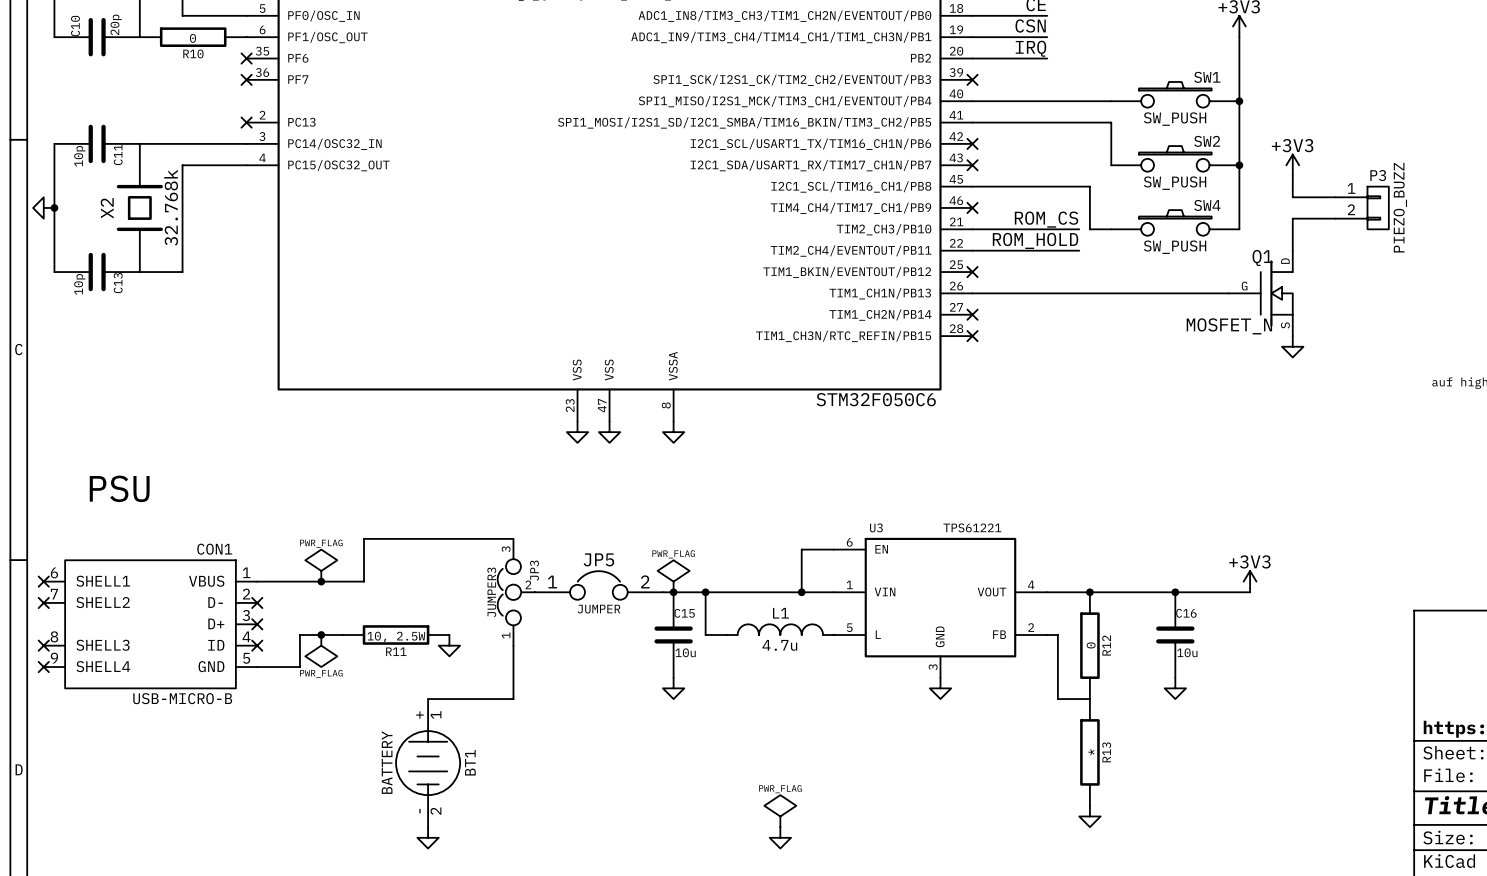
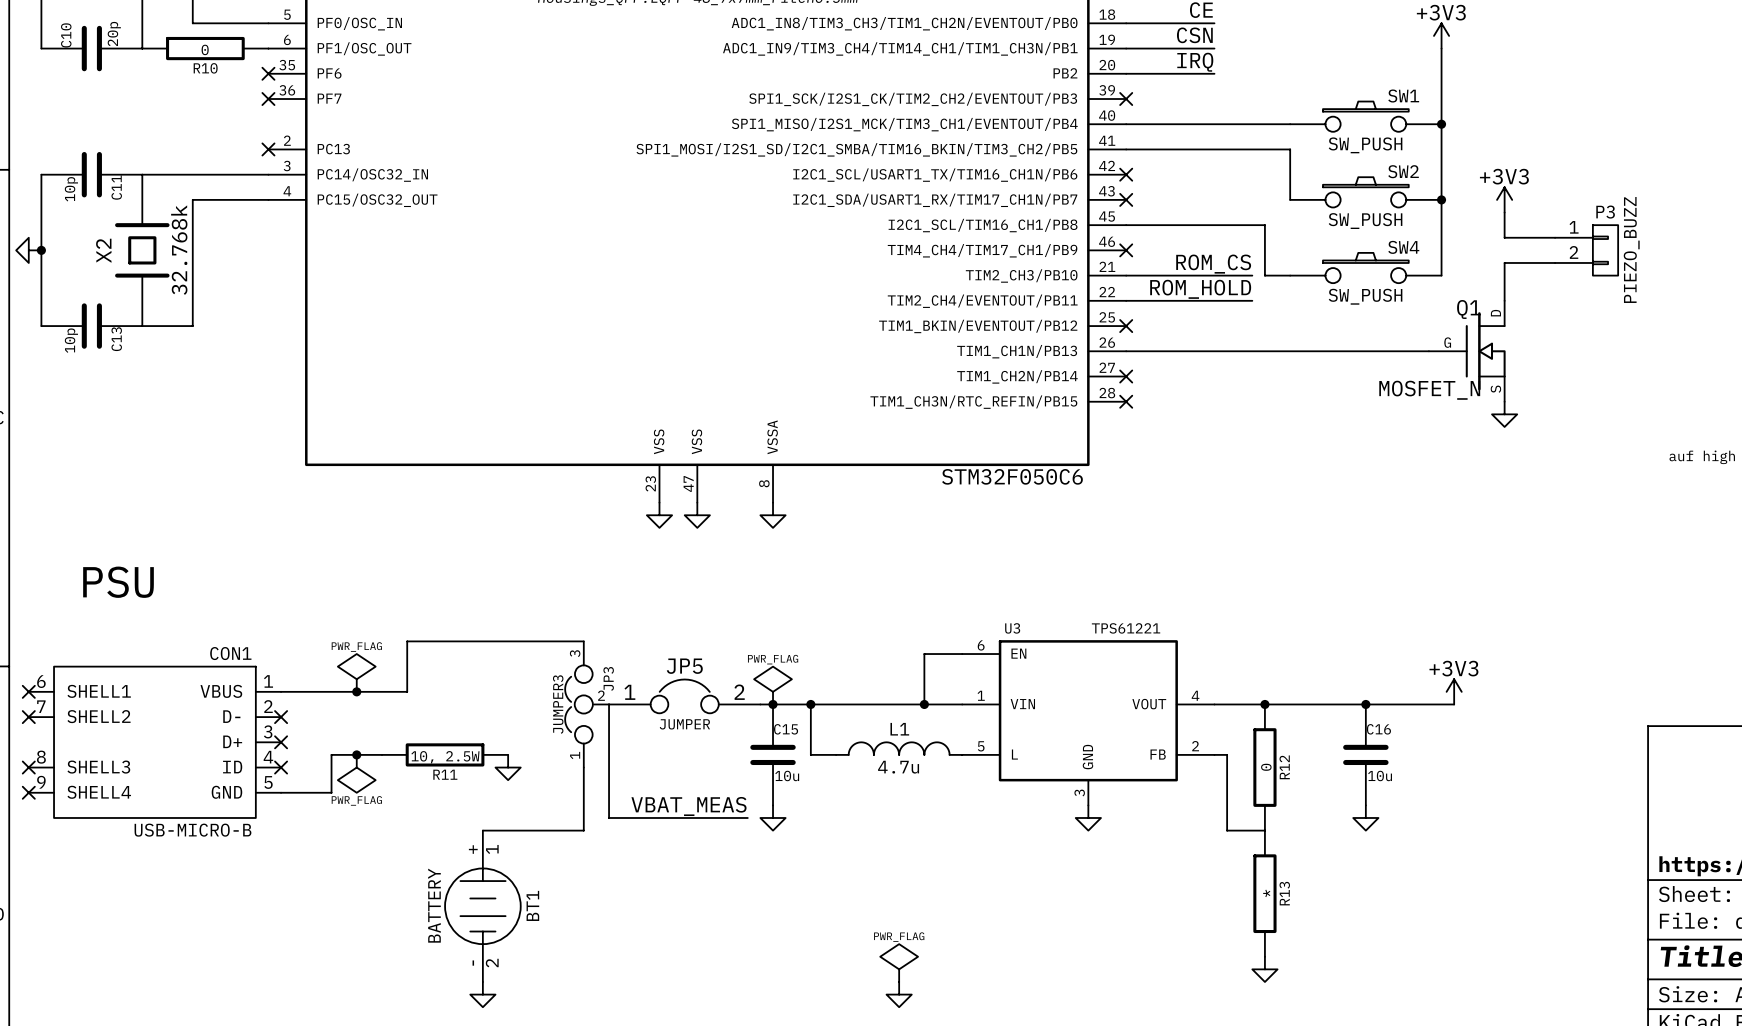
wire: none -> (609, 704) (609, 817) (747, 817)
label: none -> VBAT_MEAS (688, 806)

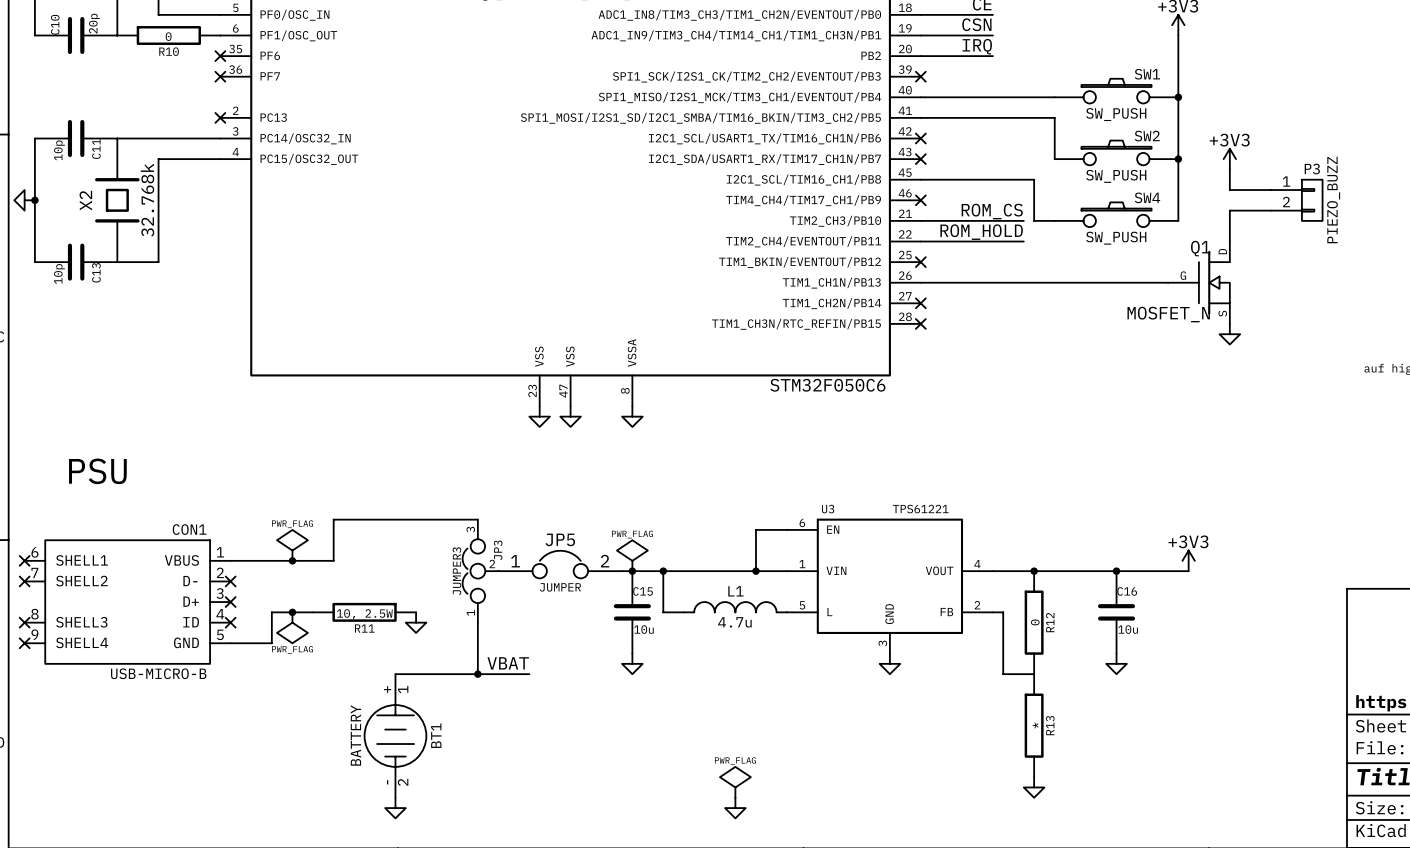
wire: (609, 704) (609, 817) (747, 817) -> none
label: VBAT_MEAS (688, 806) -> VBAT (508, 663)
wire: none -> (477, 674) (529, 674)
junction: none -> (477, 674)

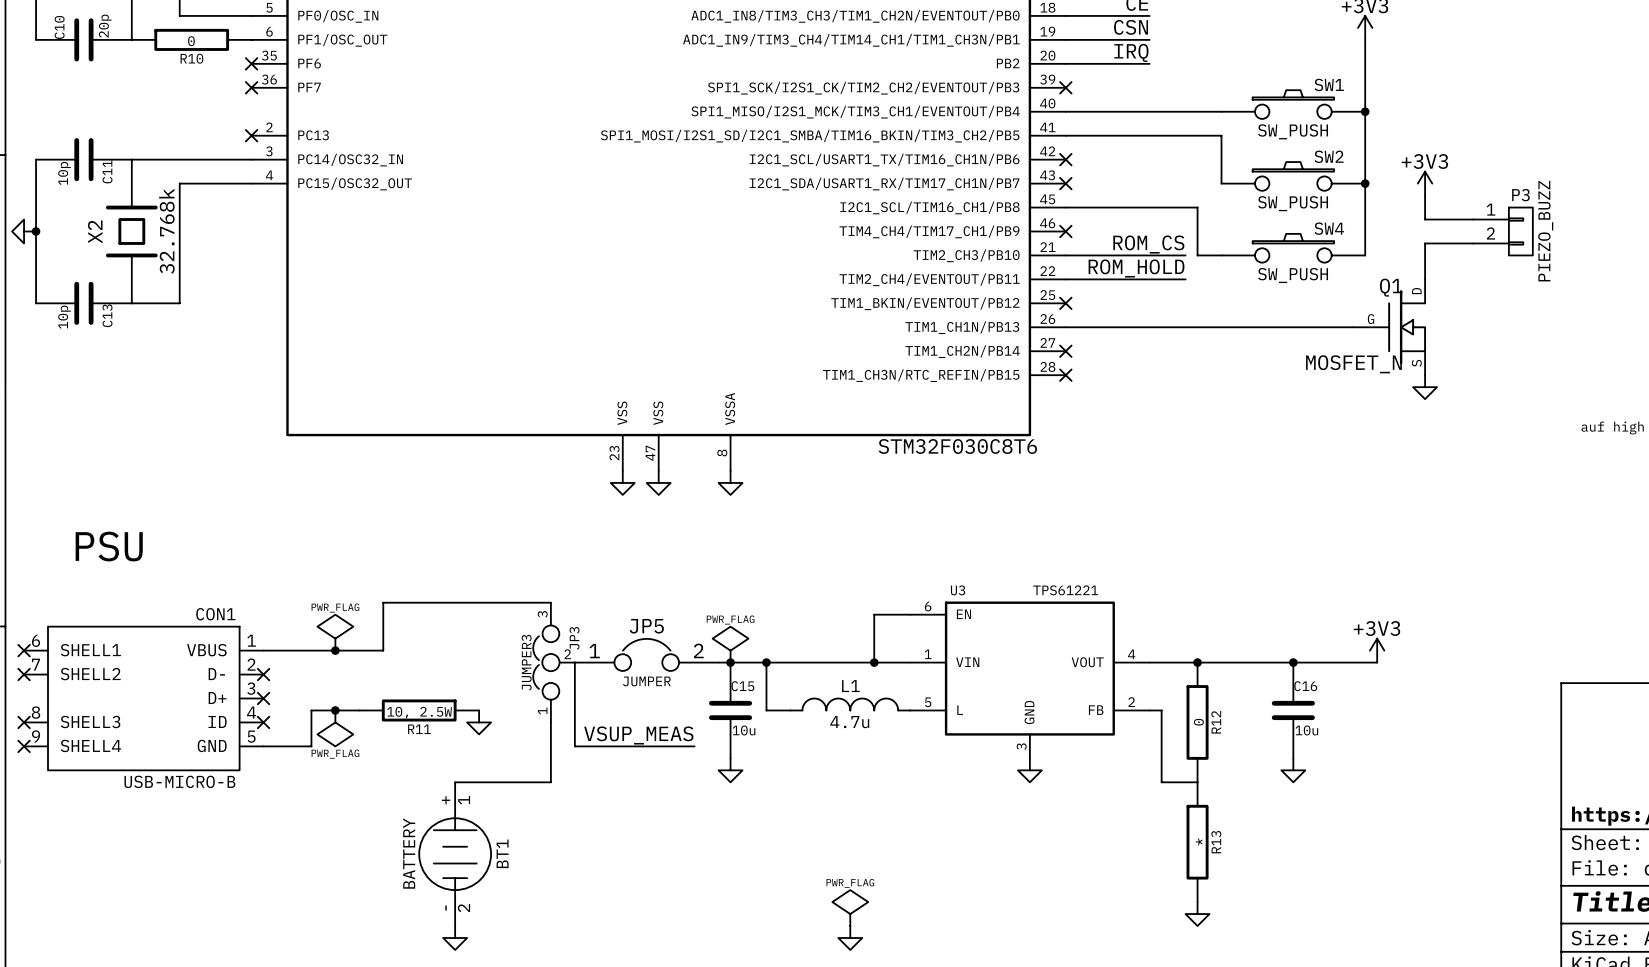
part value: STM32F050C6 (827, 385) -> STM32F030C8T6 (957, 446)
wire: none -> (574, 662) (574, 746) (694, 746)
label: none -> VSUP_MEAS (638, 735)
label: VBAT (508, 663) -> none
wire: (477, 674) (529, 674) -> none
junction: (477, 674) -> none

